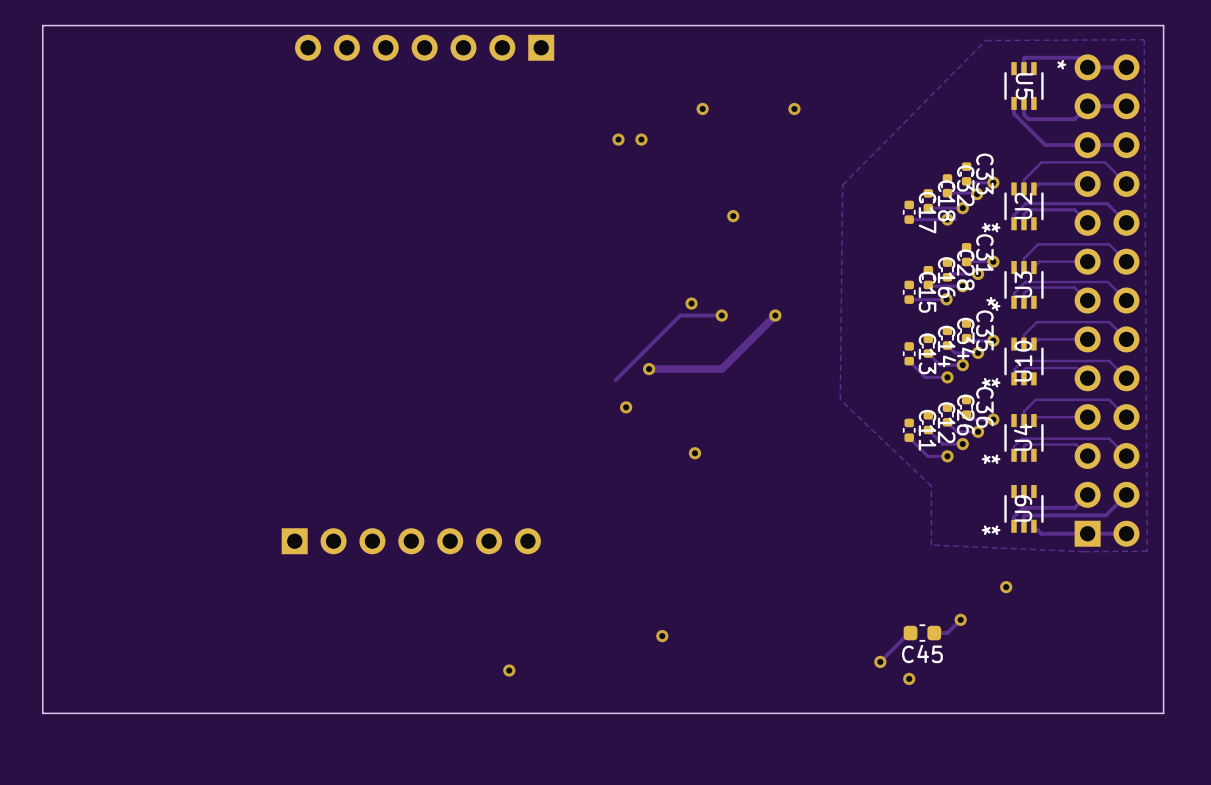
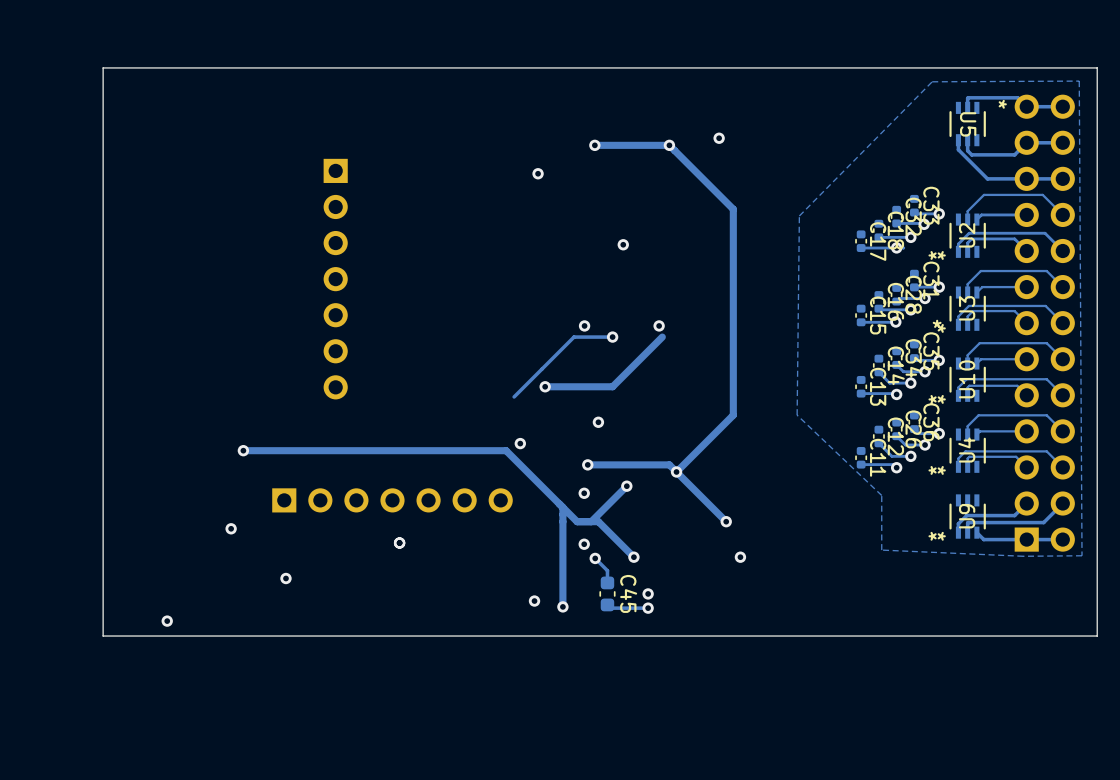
board edge: (92, 25) (42, 25) (42, 713) (1163, 713) (1163, 637) -> (103, 67) (103, 636) (1097, 636)
part: (424, 47) -> none
track: none -> (594, 145) (669, 145) (733, 209) (733, 415) (676, 471)
via: none -> (594, 145)
via position: (794, 108) -> (719, 138)
via: none -> (538, 173)
via: (618, 139) -> none
via: (641, 139) -> none
via: none -> (623, 244)
via: (733, 216) -> none
part: none -> (335, 279)
via: none -> (584, 325)
via: none -> (612, 337)
track: (721, 315) (680, 315) (615, 380) -> (612, 337) (574, 337) (514, 396)
via: (721, 315) -> none
track: (775, 315) (721, 369) (649, 369) -> (662, 337) (612, 386) (545, 386)
via: (775, 315) -> none
C13 position: (909, 353) -> (861, 386)
track: (909, 361) (925, 377) (947, 377) -> (861, 393) (896, 394)
via: none -> (545, 386)
via: (649, 369) -> none
via: none -> (520, 443)
C11 position: (909, 430) -> (861, 457)
track: none -> (243, 450) (506, 450) (577, 521) (598, 521) (633, 557)
via: none -> (243, 450)
track: (909, 437) (927, 456) (947, 456) -> (861, 464) (893, 464) (896, 467)
track: none -> (587, 464) (669, 464) (726, 521)
via: none -> (587, 464)
via position: (694, 453) -> (676, 471)
track: none -> (626, 486) (591, 521)
via: none -> (626, 486)
via: none -> (584, 493)
track: none -> (562, 507) (562, 606)
via: none -> (726, 521)
via: none -> (231, 528)
via: none -> (399, 542)
via: none -> (584, 544)
part position: (411, 541) -> (392, 500)
via: none -> (633, 557)
via: none -> (740, 557)
track: none -> (595, 558) (607, 570) (607, 582)
via: none -> (595, 558)
via: none -> (285, 578)
via: (1006, 587) -> none
via: none -> (648, 593)
via: none -> (534, 601)
track: none -> (607, 604) (610, 608) (648, 608)
via: none -> (562, 606)
via: none -> (648, 608)
track: (960, 619) (947, 633) (934, 633) -> none
via: (960, 619) -> none
via: none -> (167, 621)
track: (910, 633) (880, 661) -> none
C45 rotation: 0° (922, 633) -> 90° clockwise (607, 593)
C45 position: (922, 633) -> (607, 593)
via: (662, 636) -> none
C45 name position: C45 (922, 653) -> C45 (628, 593)
via: (880, 661) -> none
via: (509, 670) -> none
via: (909, 678) -> none

